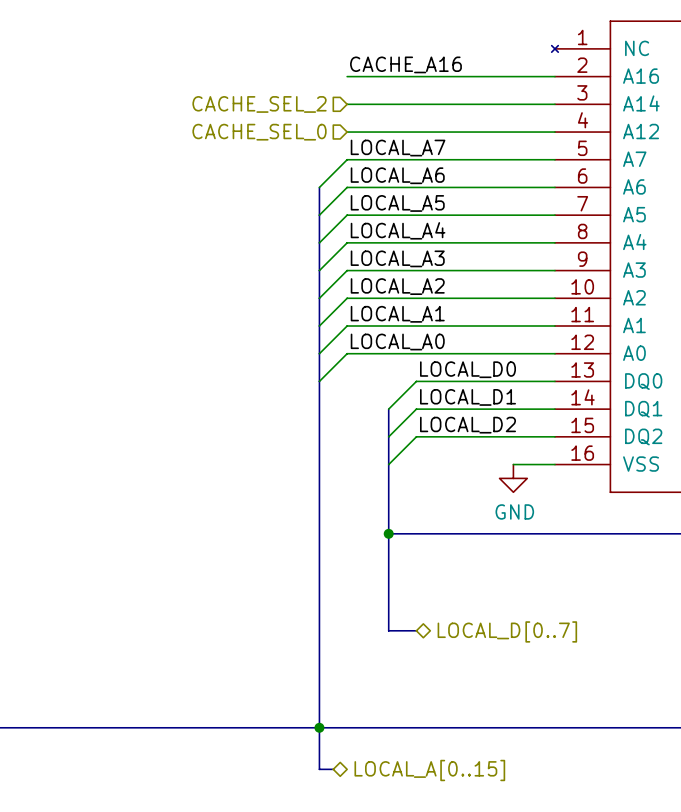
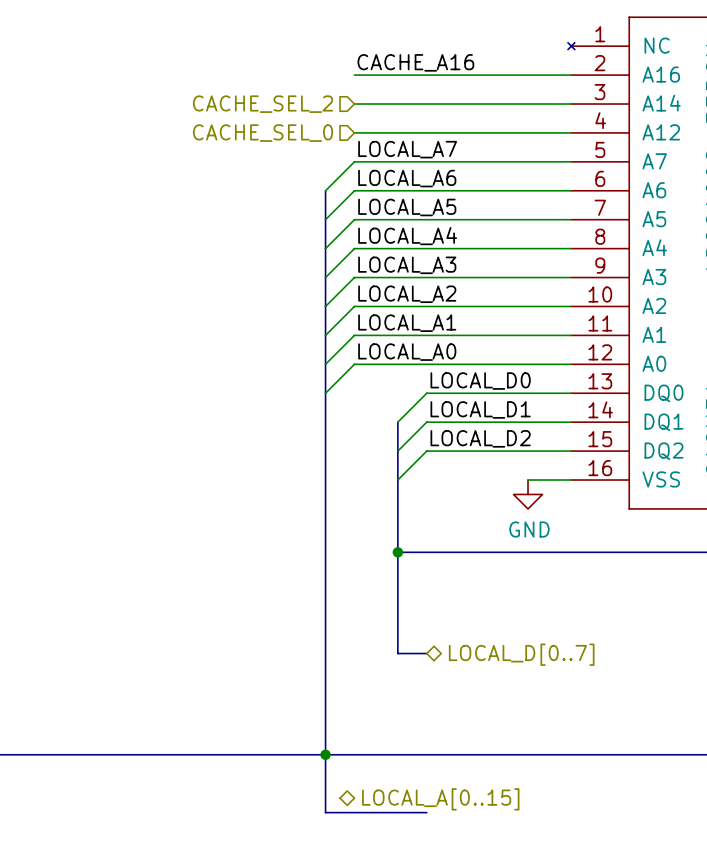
bus: (319, 769) (333, 769) -> (325, 798) (325, 812) (426, 812)

